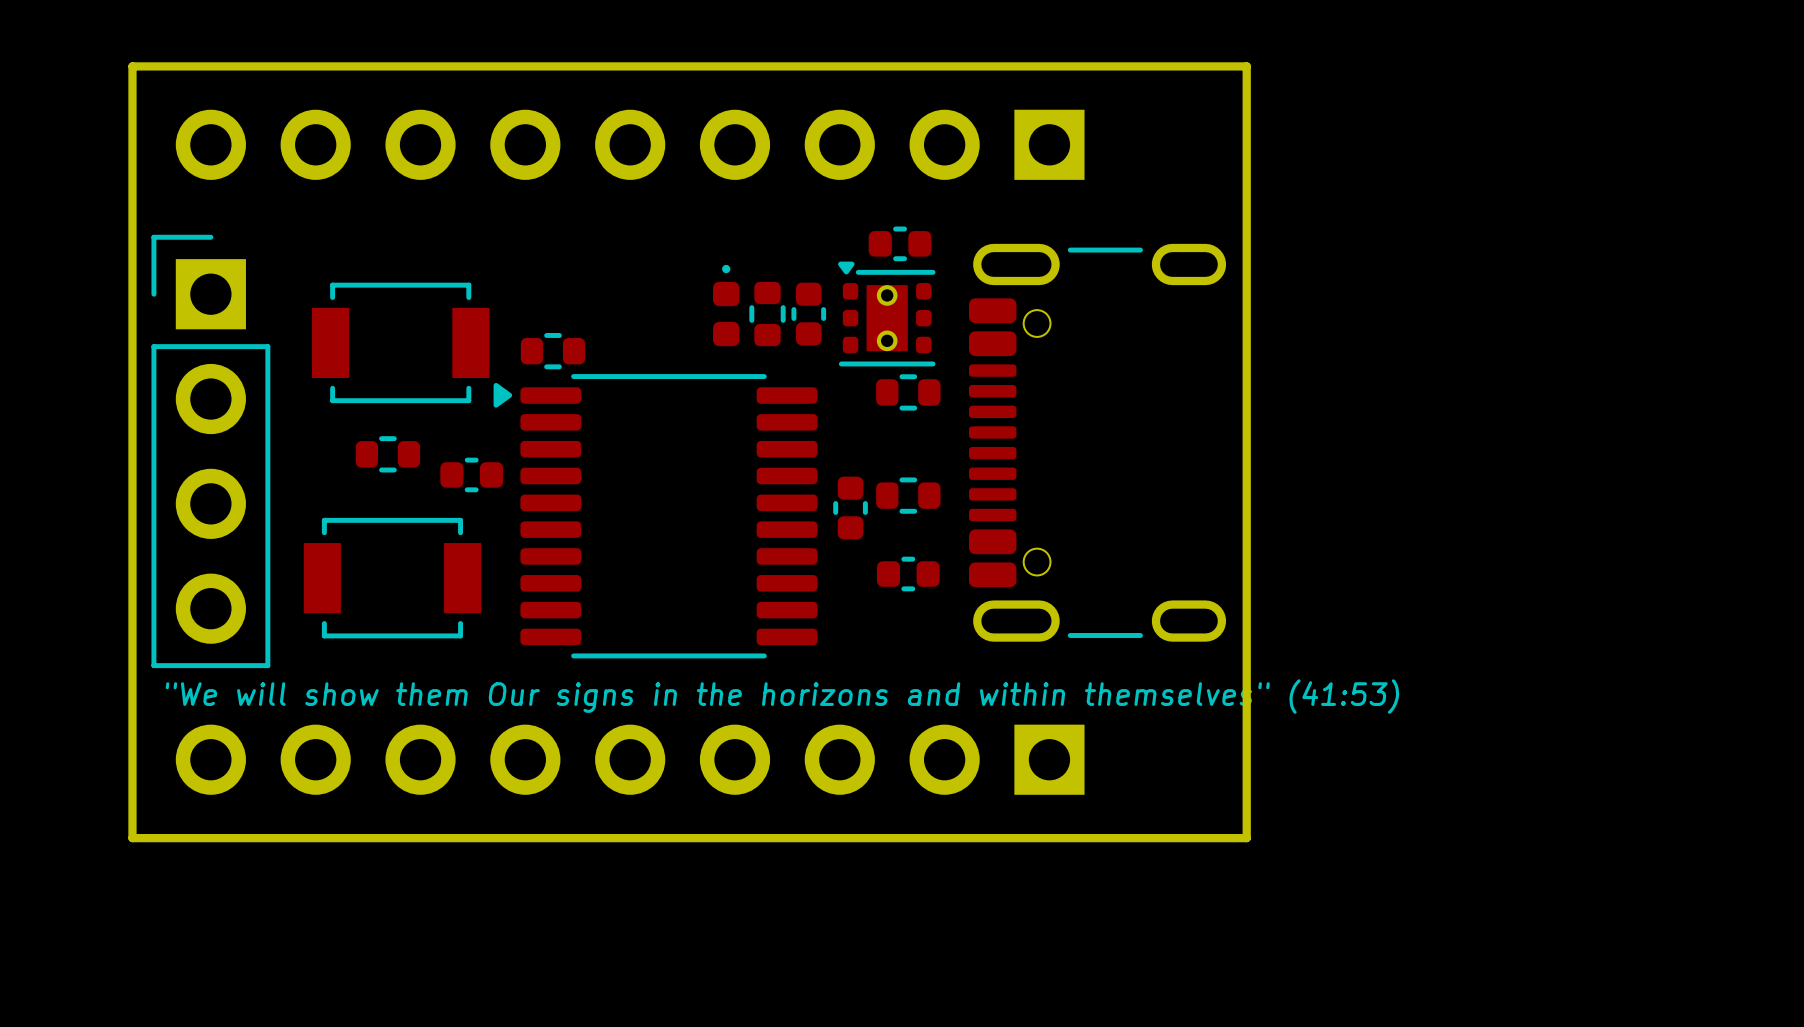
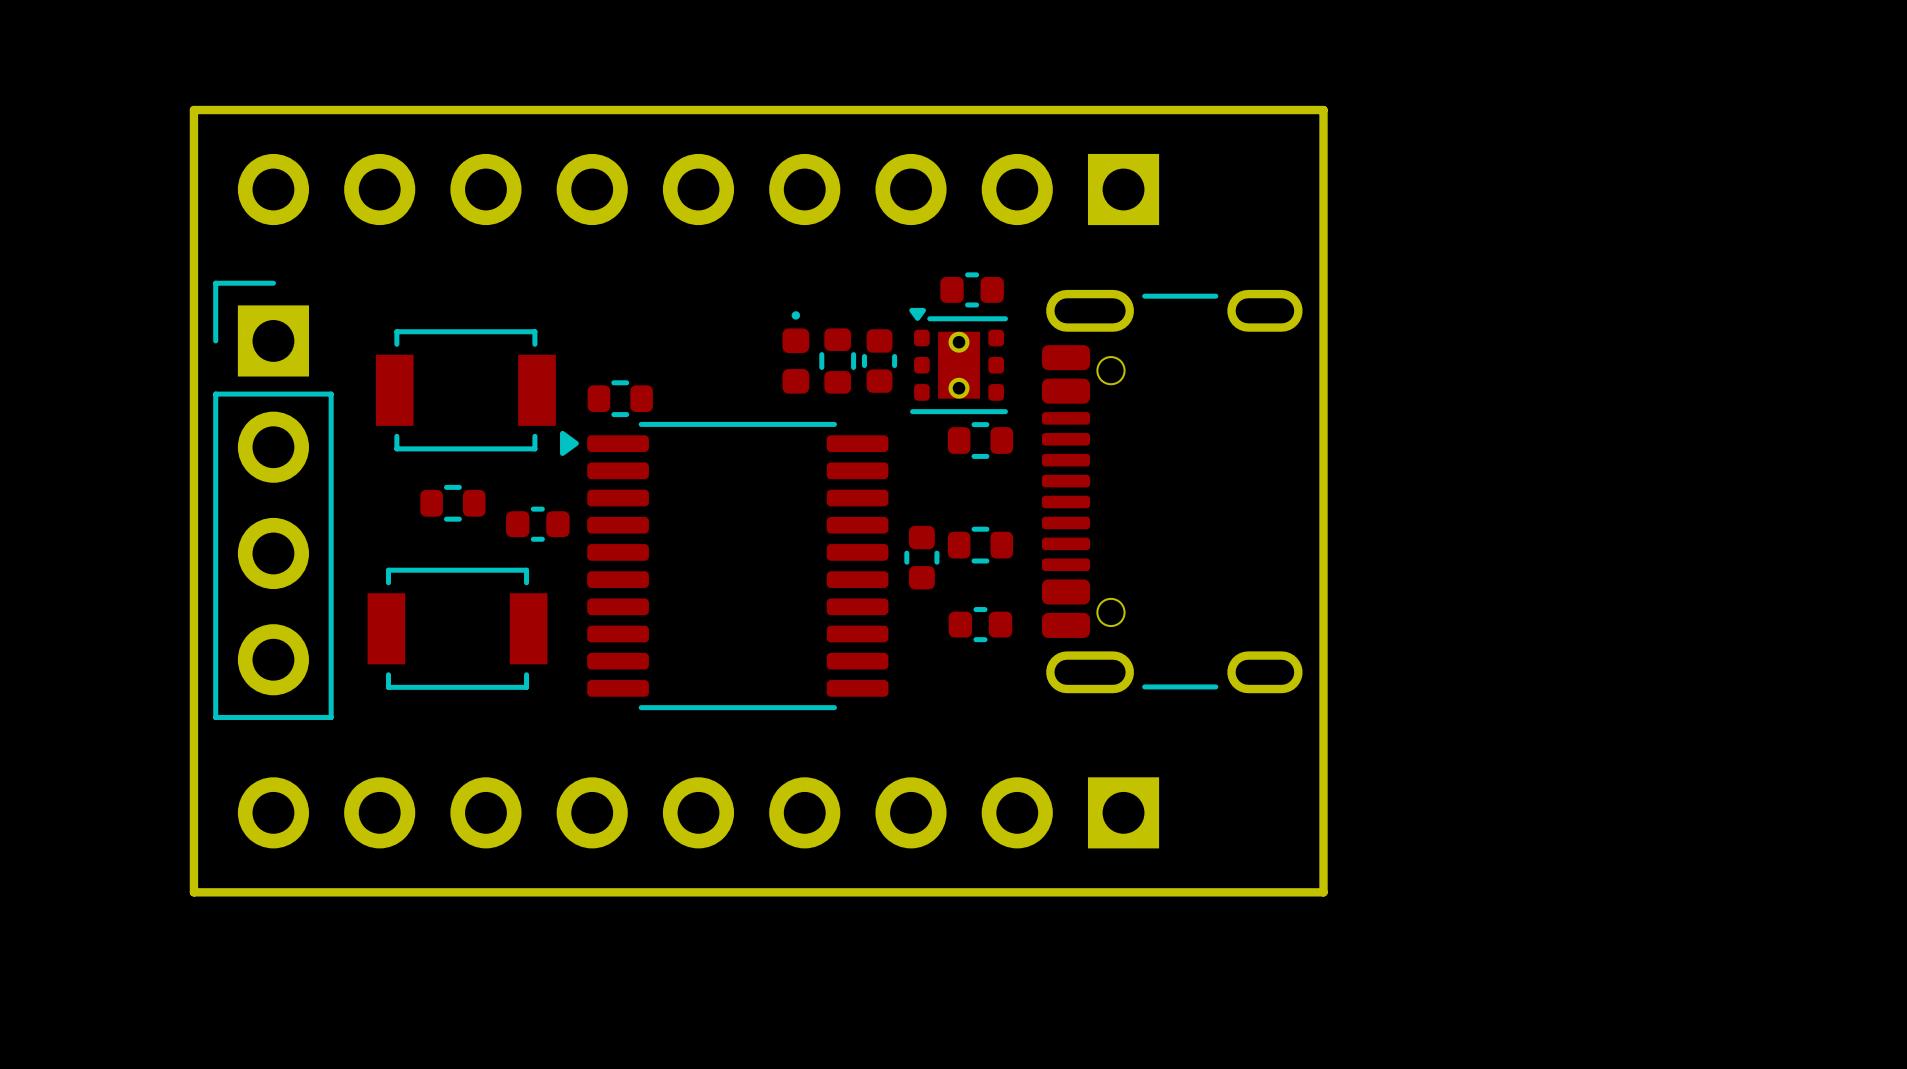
text: "We will show them Our signs in the horizons and within themselves" (41:53) (782, 696) -> none

